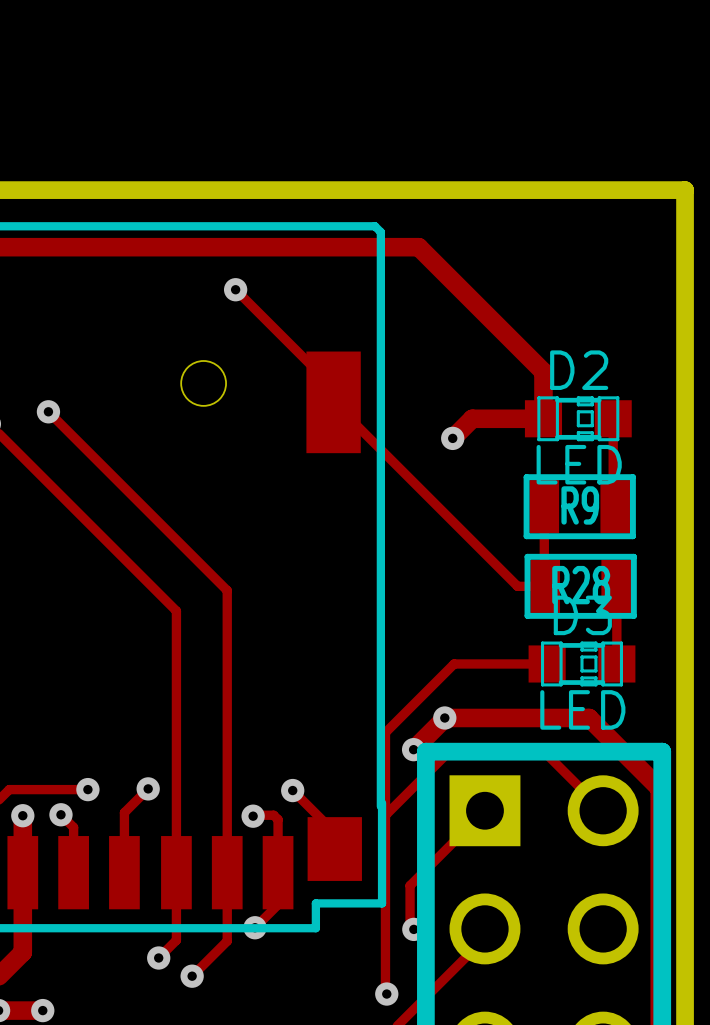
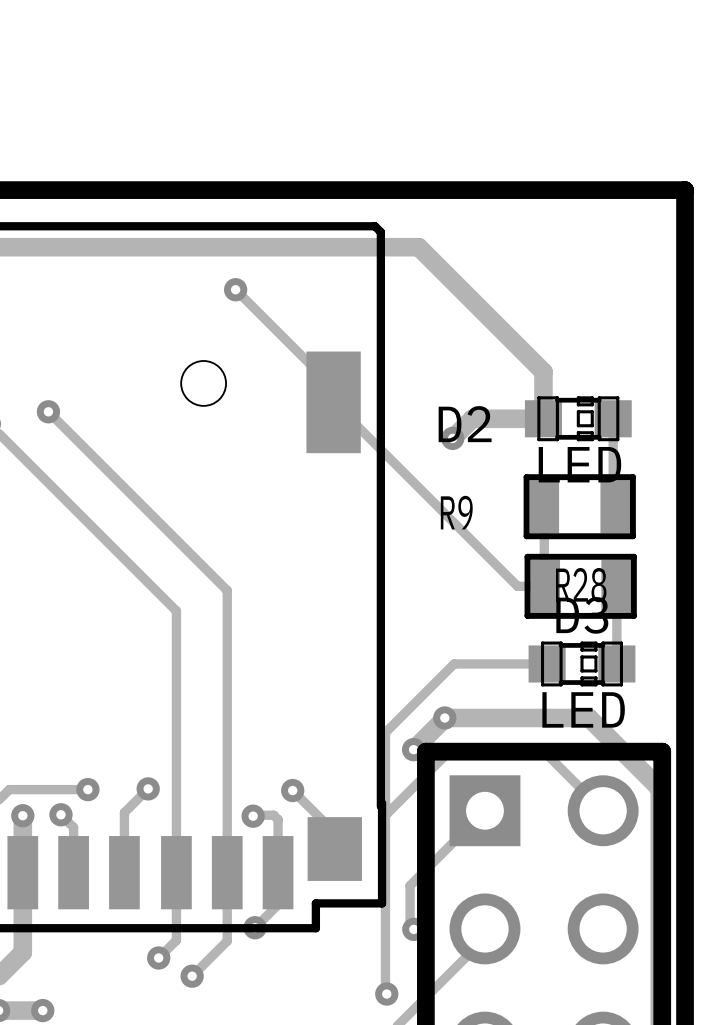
D2 name position: D2 (579, 370) -> D2 (465, 424)
R9 name position: R9 (580, 505) -> R9 (456, 512)

